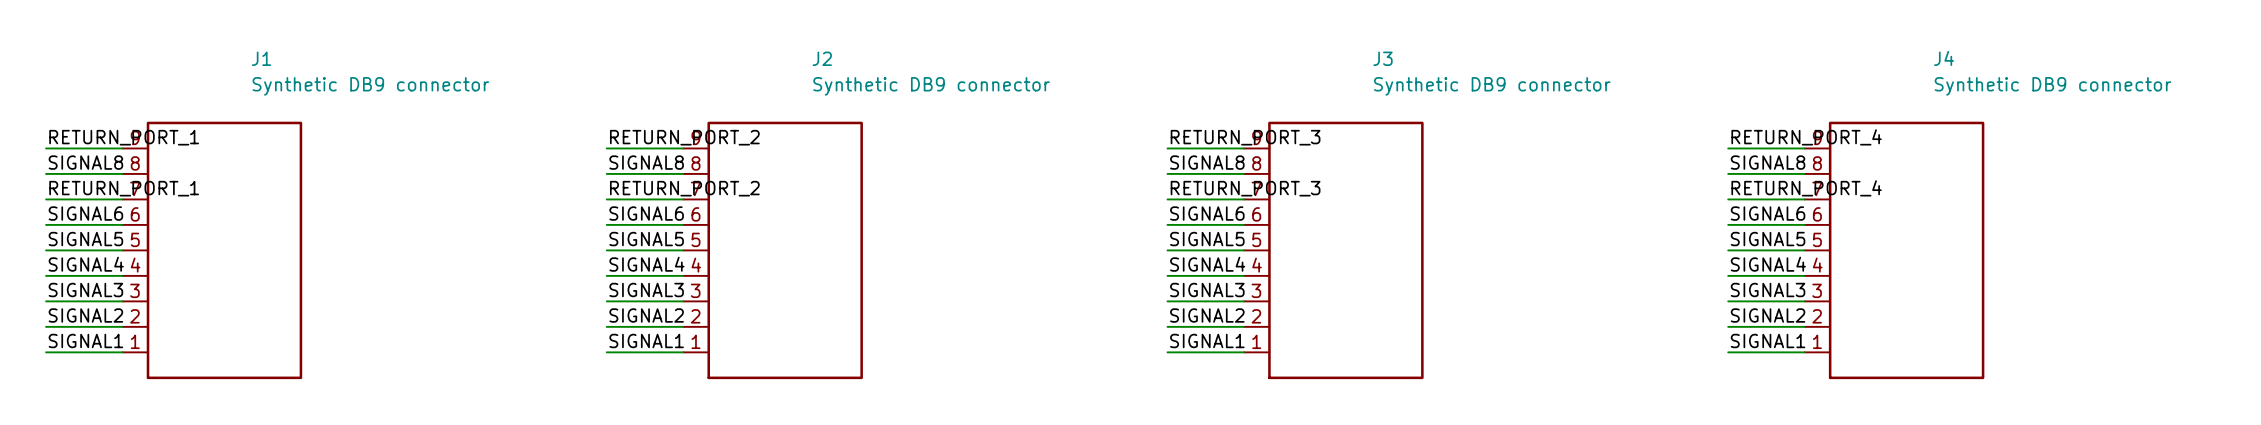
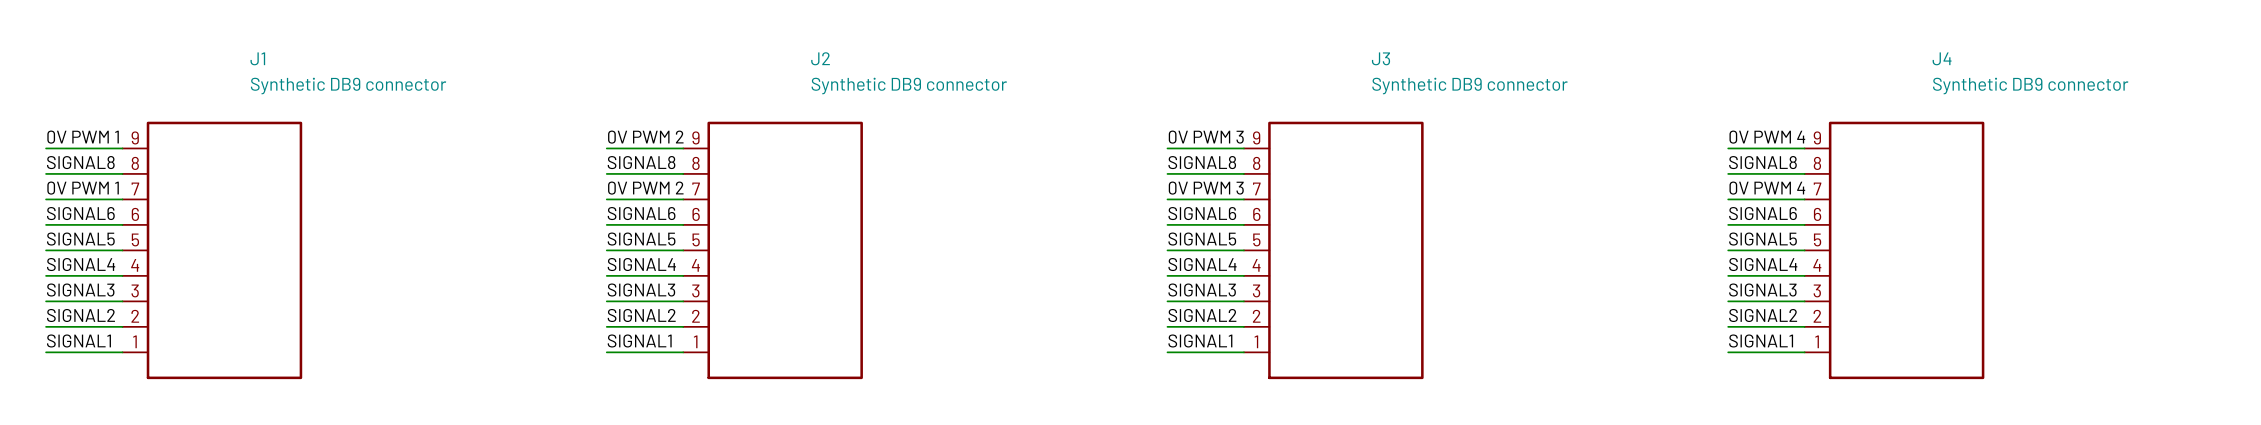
label: RETURN_PORT_1 (124, 137) -> 0V PWM 1 (83, 137)
label: RETURN_PORT_2 (684, 137) -> 0V PWM 2 (645, 137)
label: RETURN_PORT_3 (1245, 137) -> 0V PWM 3 (1206, 137)
label: RETURN_PORT_4 (1806, 137) -> 0V PWM 4 (1767, 137)
label: RETURN_PORT_1 (124, 188) -> 0V PWM 1 (83, 188)
label: RETURN_PORT_2 (684, 188) -> 0V PWM 2 (645, 188)
label: RETURN_PORT_3 (1245, 188) -> 0V PWM 3 (1206, 188)
label: RETURN_PORT_4 (1806, 188) -> 0V PWM 4 (1767, 188)

